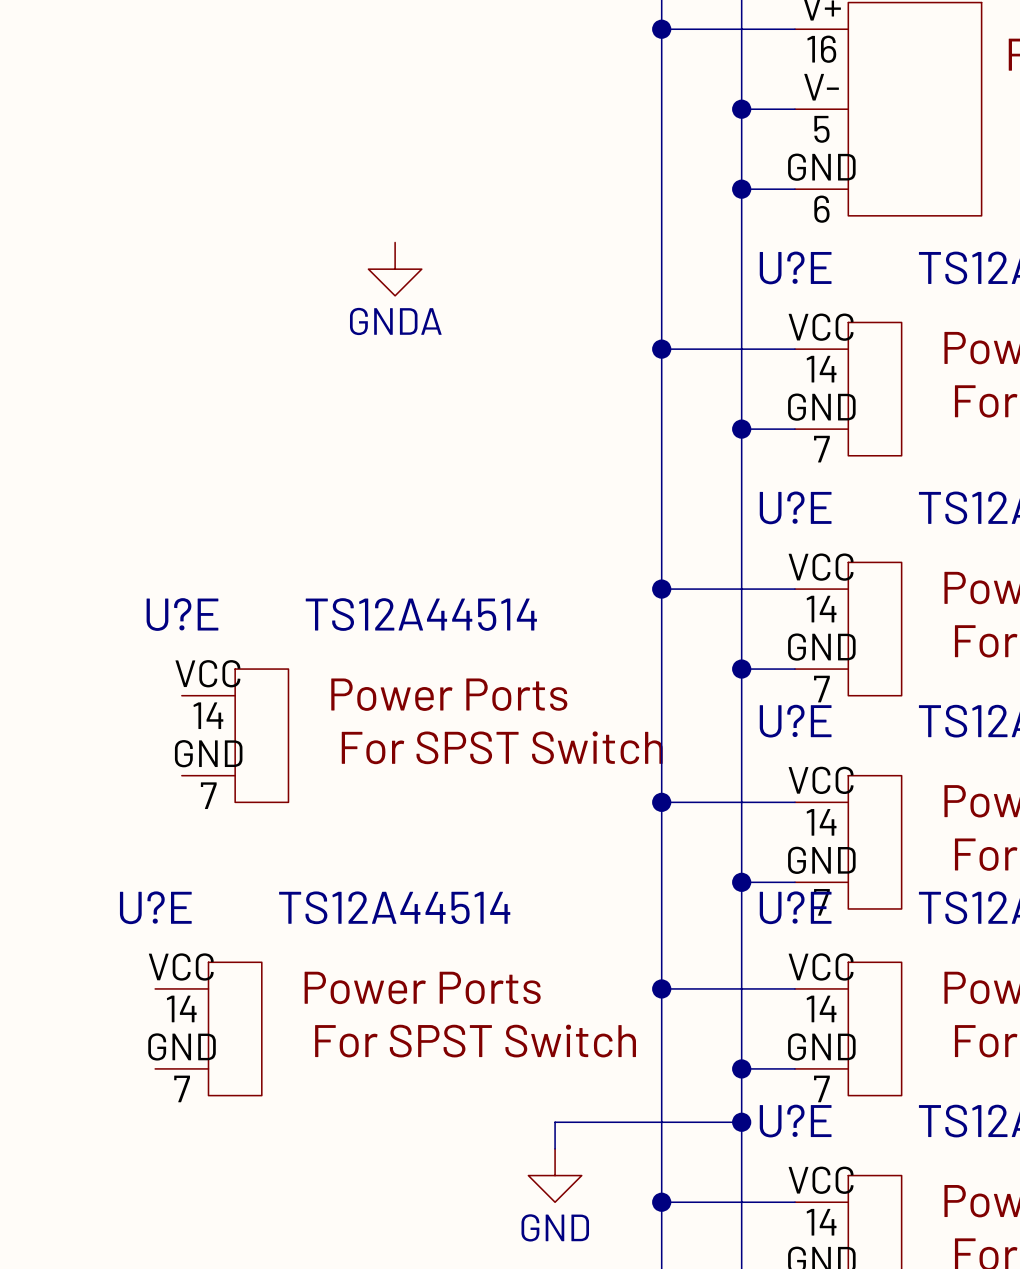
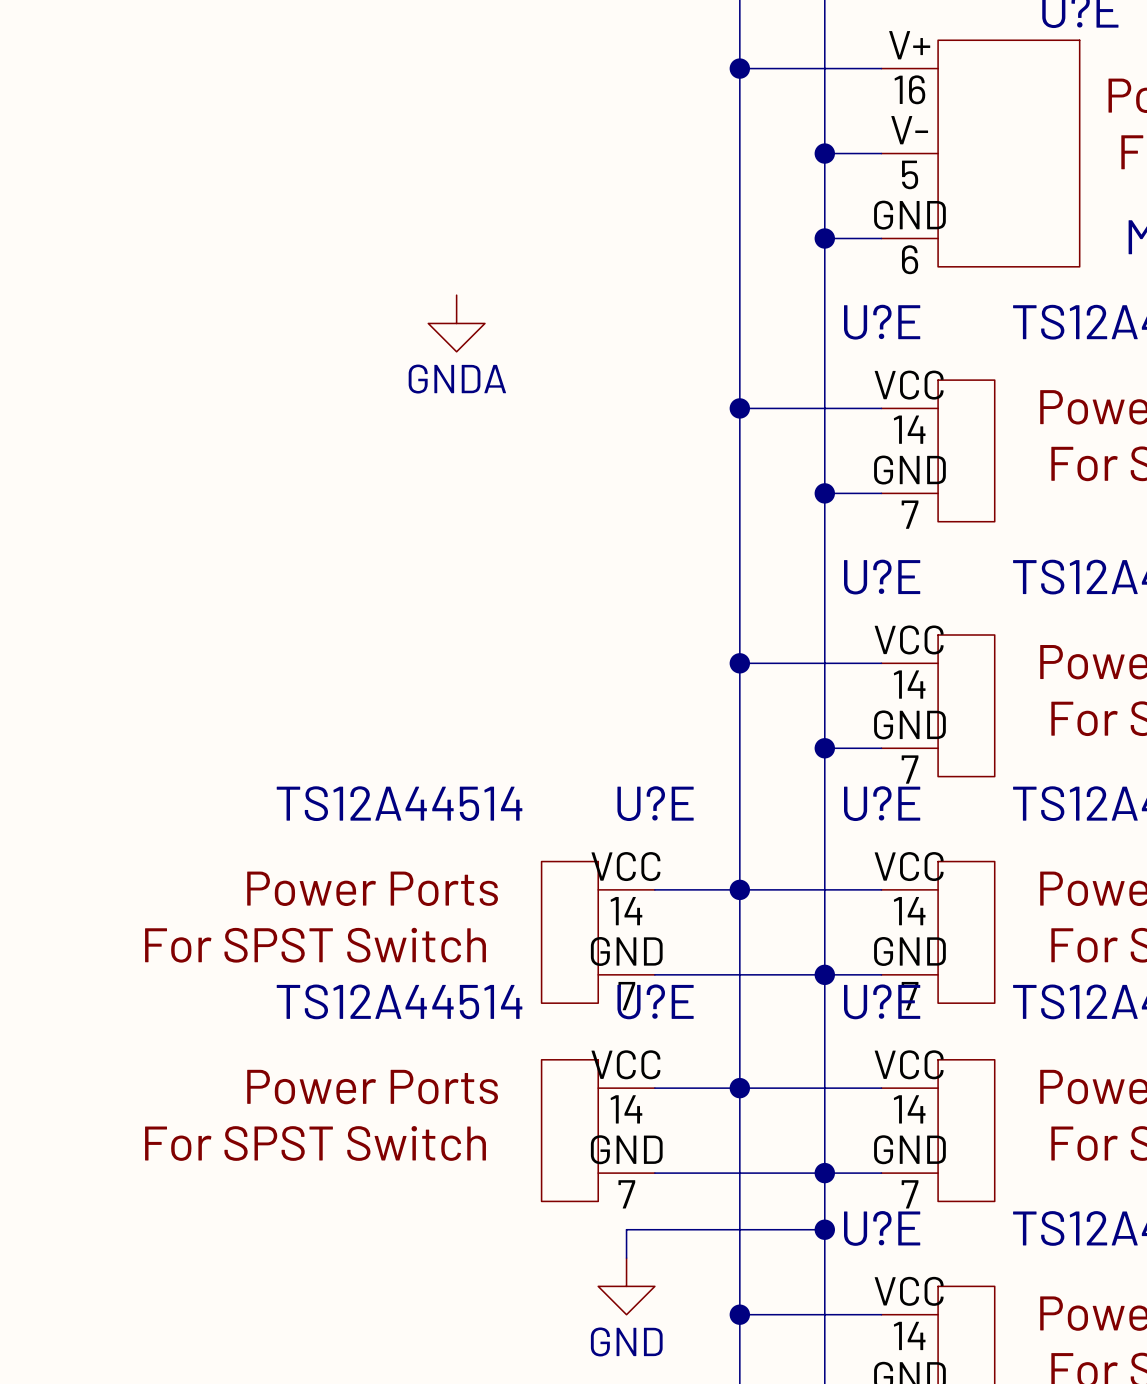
U?E: TS12A44514 (235, 735) -> none
wire: none -> (654, 889) (739, 889)
U?E: none -> TS12A44514 (598, 932)
wire: none -> (654, 974) (824, 974)
wire: none -> (654, 1088) (739, 1088)
U?E: TS12A44514 (208, 1028) -> none
U?E: none -> TS12A44514 (598, 1130)
wire: none -> (654, 1173) (824, 1173)

